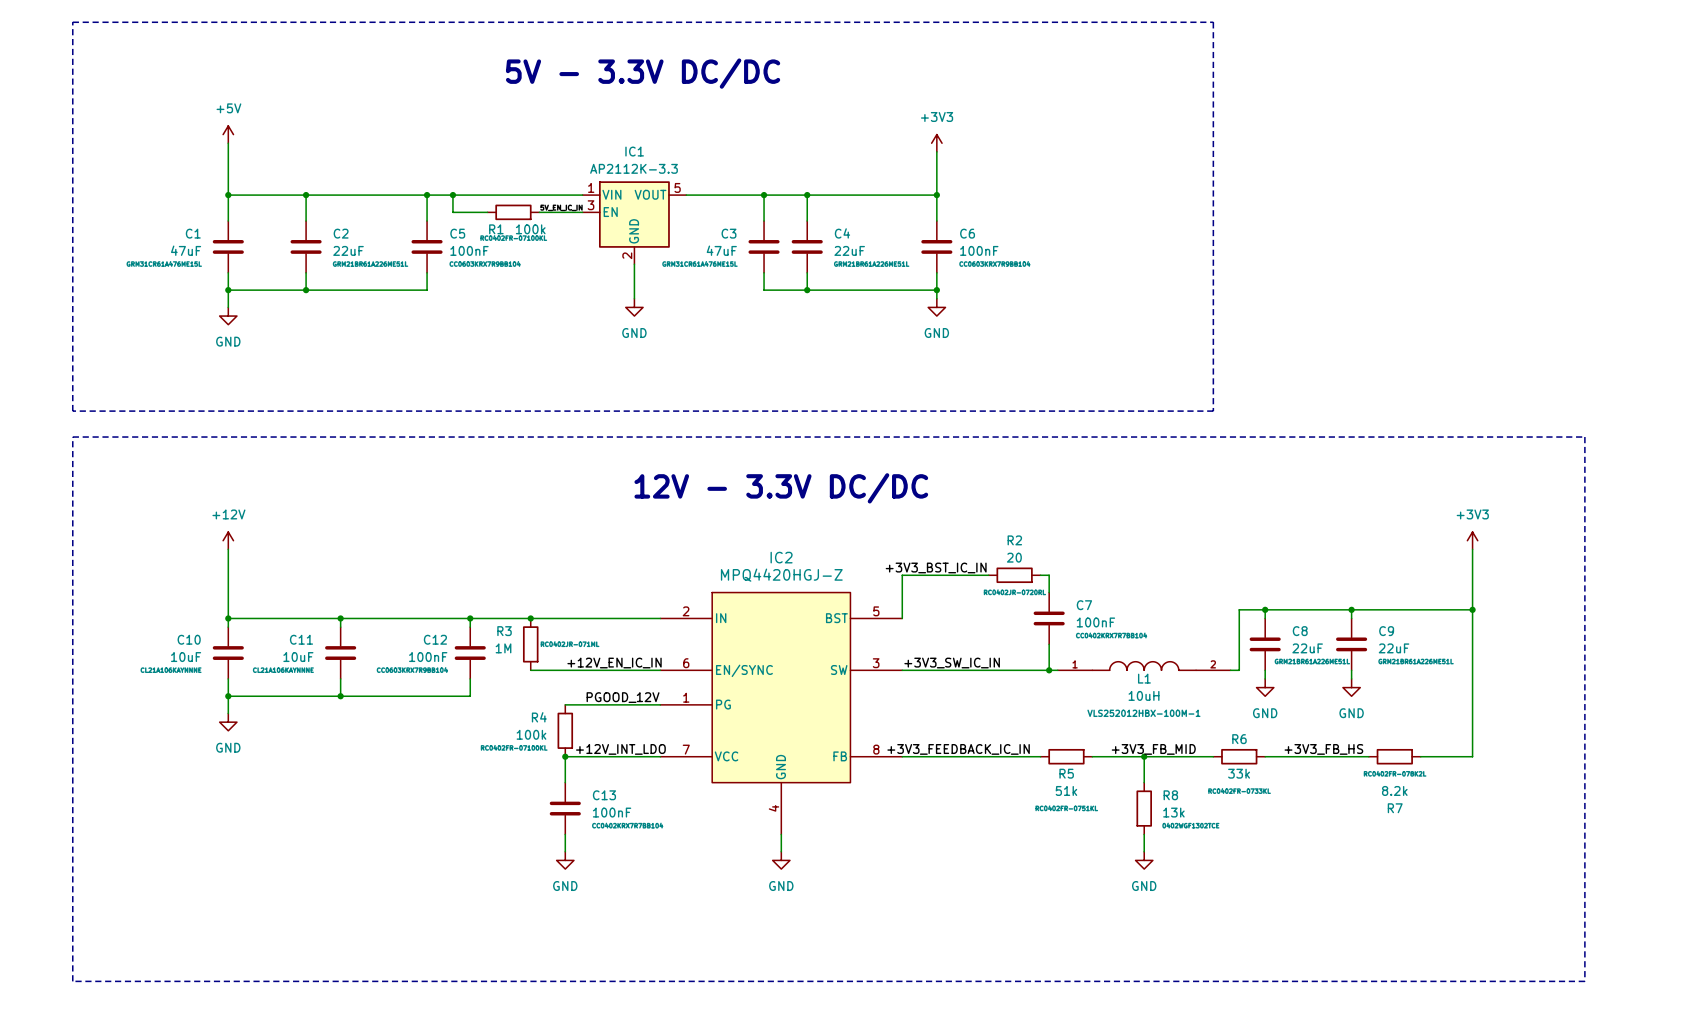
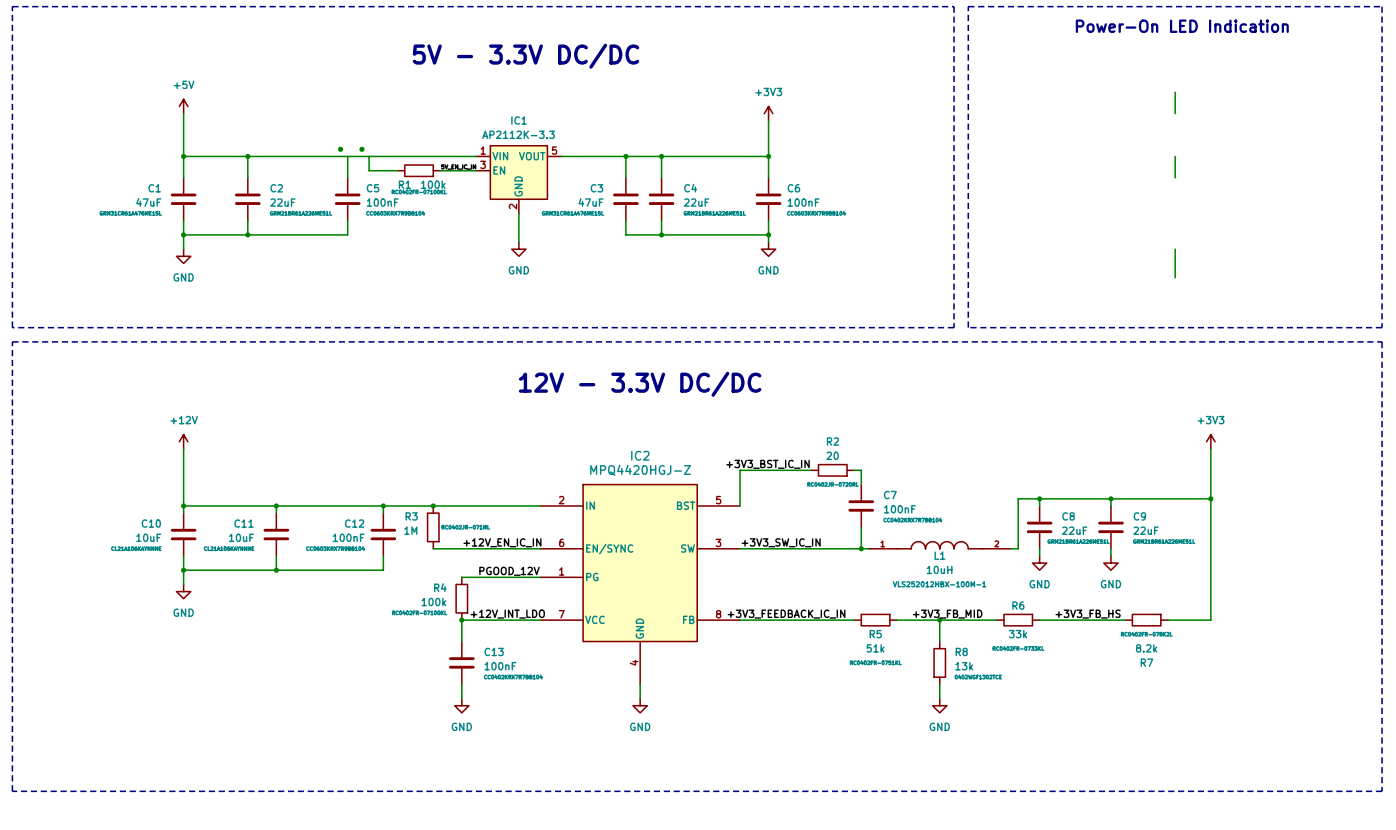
line: none -> (968, 6) (1382, 6) (1382, 327) (968, 327) (968, 6)
line: (72, 22) (1213, 22) (1213, 411) (72, 411) (72, 22) -> (12, 6) (954, 6) (954, 327) (12, 327) (12, 6)
text: none -> Power-On LED Indication (1182, 26)
wire: none -> (1175, 92) (1175, 113)
junction: none -> (340, 149)
junction: none -> (361, 149)
junction: (427, 195) -> none
junction: (452, 195) -> none
wire: none -> (1175, 156) (1175, 177)
wire: none -> (1175, 249) (1175, 277)
line: (72, 437) (72, 981) (1584, 981) (1584, 437) (72, 437) -> (12, 341) (12, 791) (1382, 791) (1382, 341) (12, 341)
text position: 12V - 3.3V DC/DC (781, 488) -> 12V - 3.3V DC/DC (640, 384)

